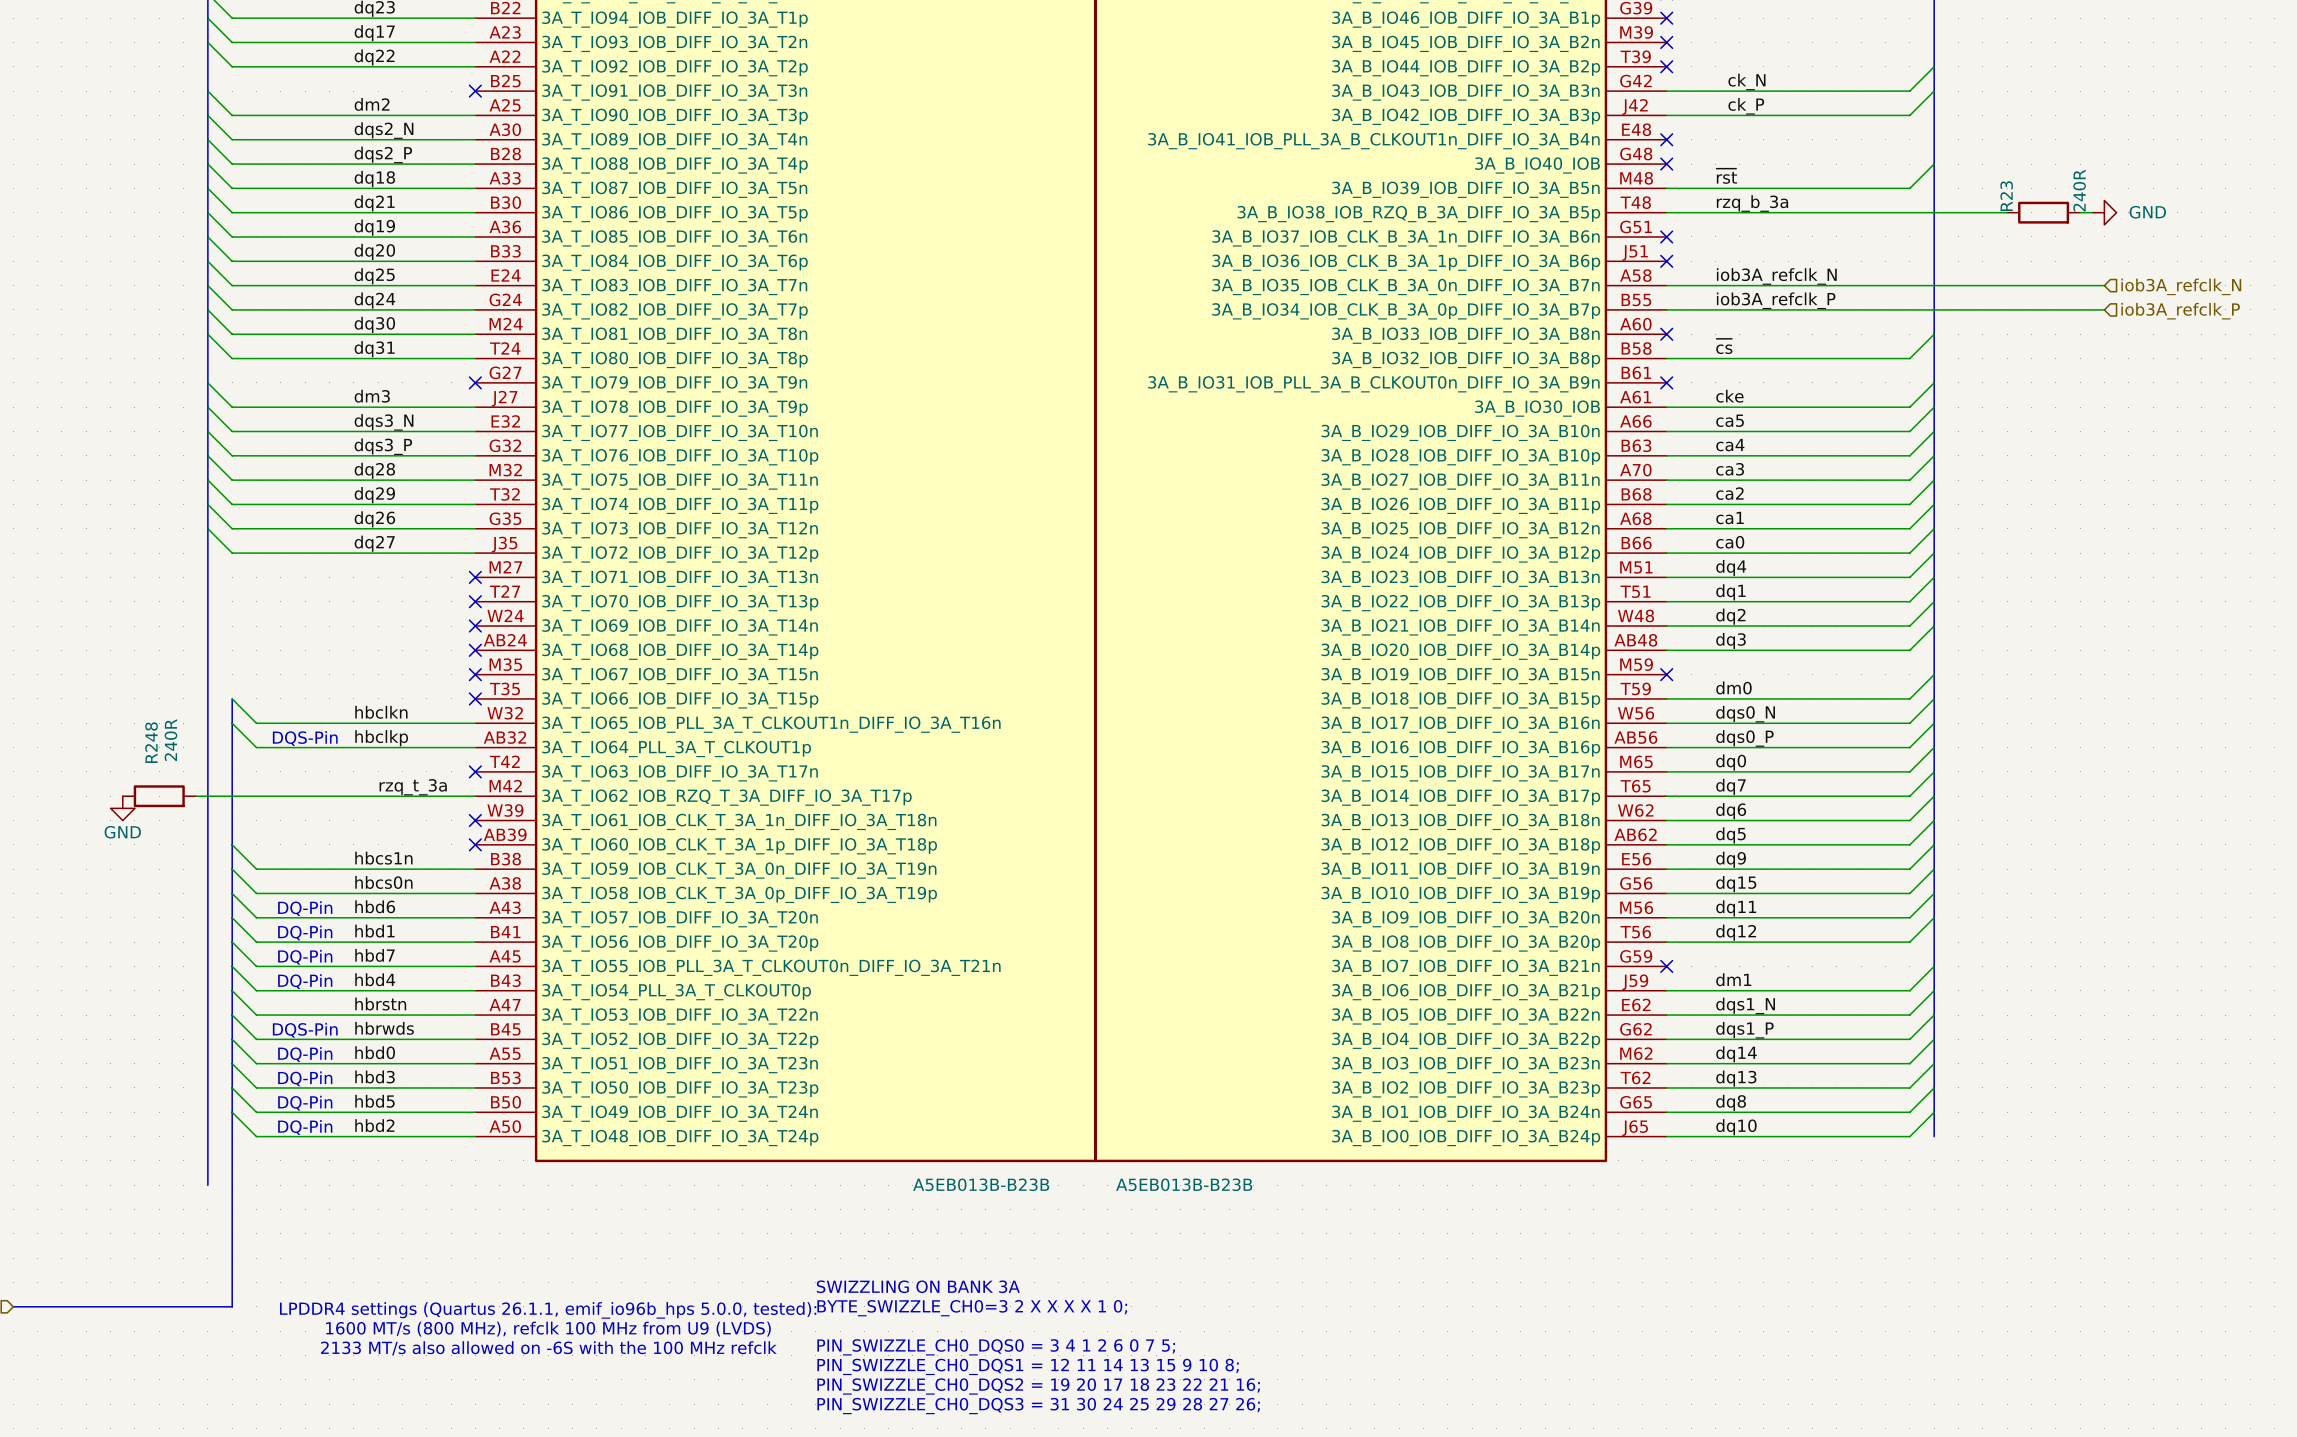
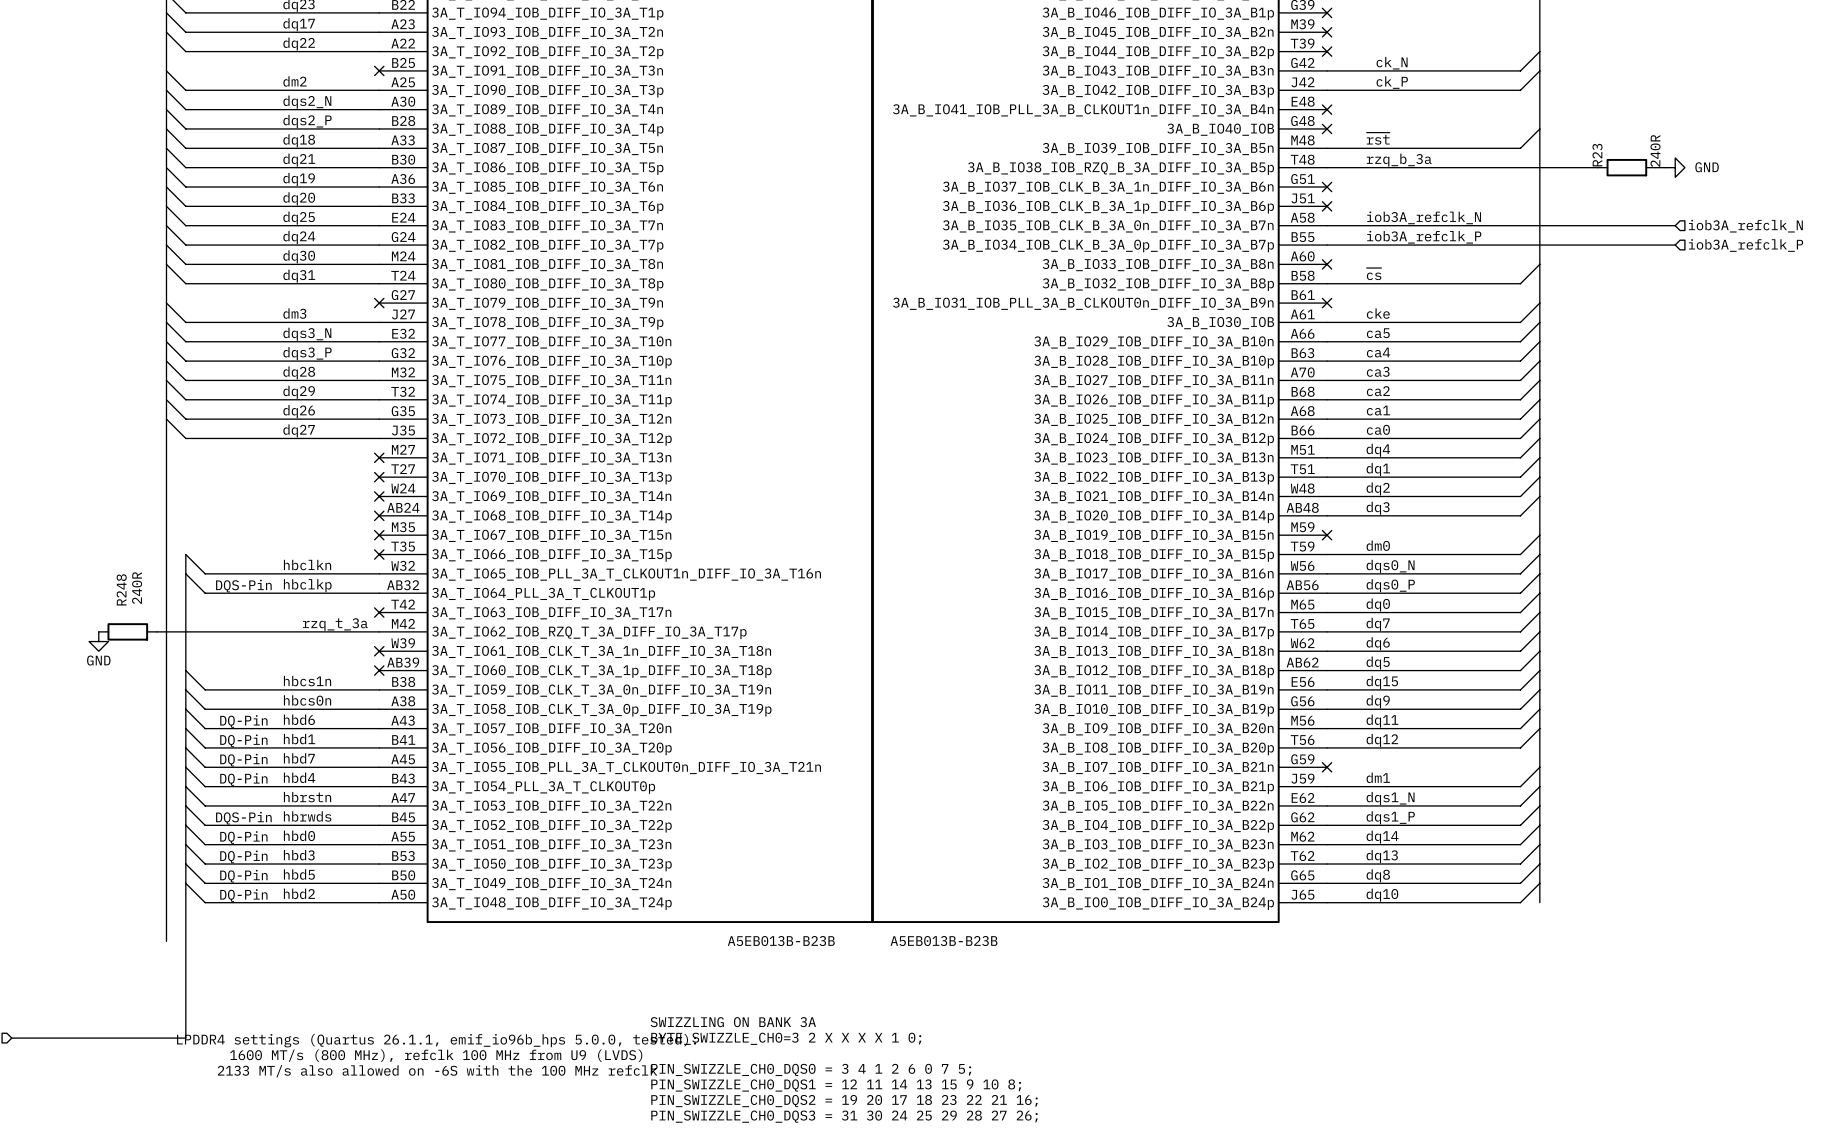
label: dq9 (1731, 859) -> dq15 (1382, 682)
label: dq15 (1736, 884) -> dq9 (1378, 701)

